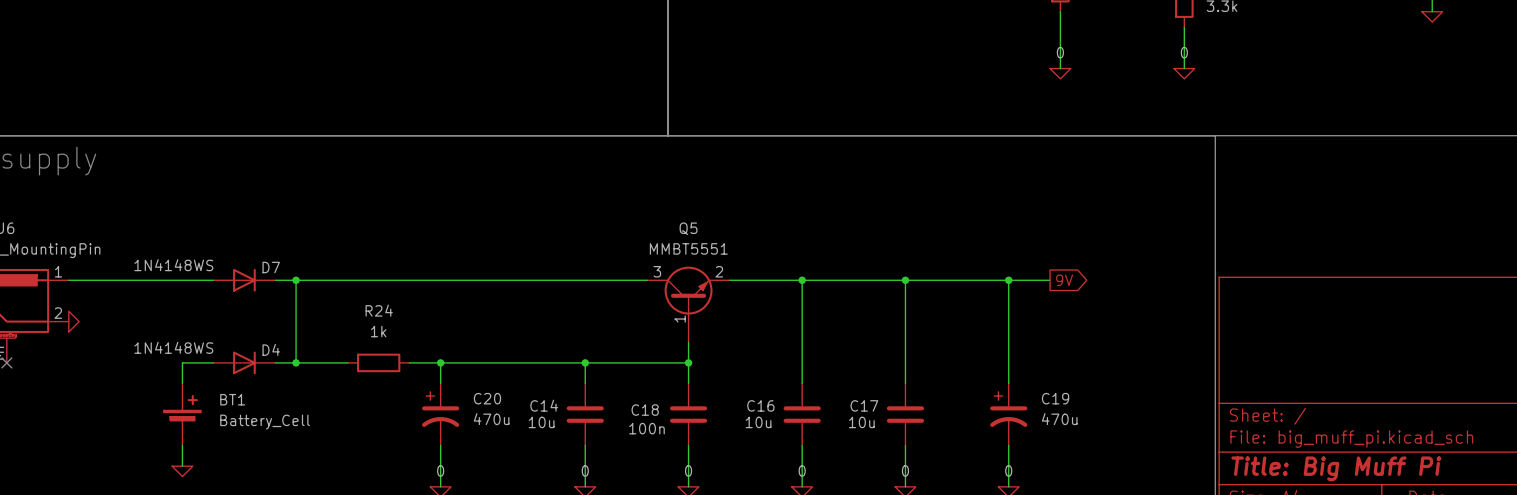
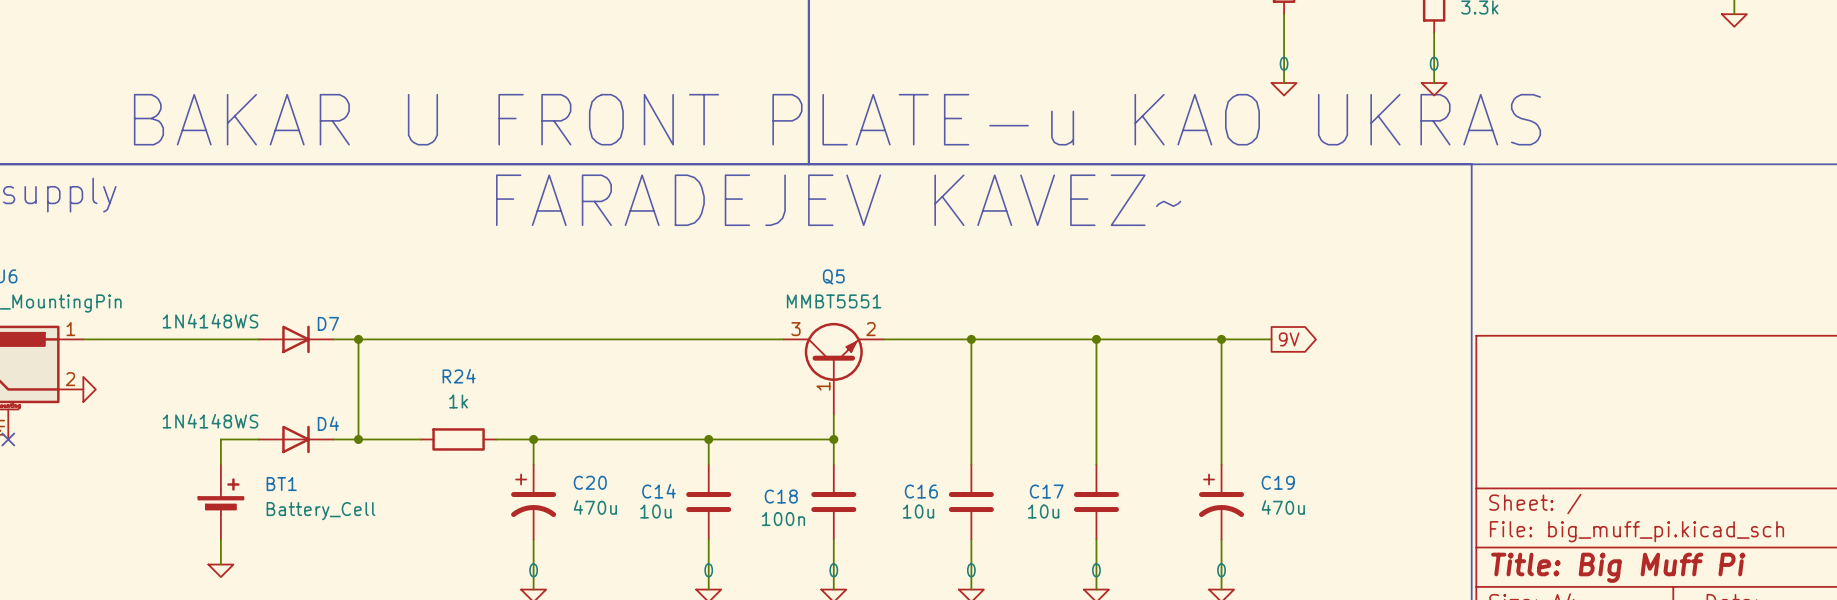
text: none -> BAKAR U FRONT PLATE-u KAO UKRAS (837, 119)
text: none -> FARADEJEV KAVEZ~ (838, 200)

